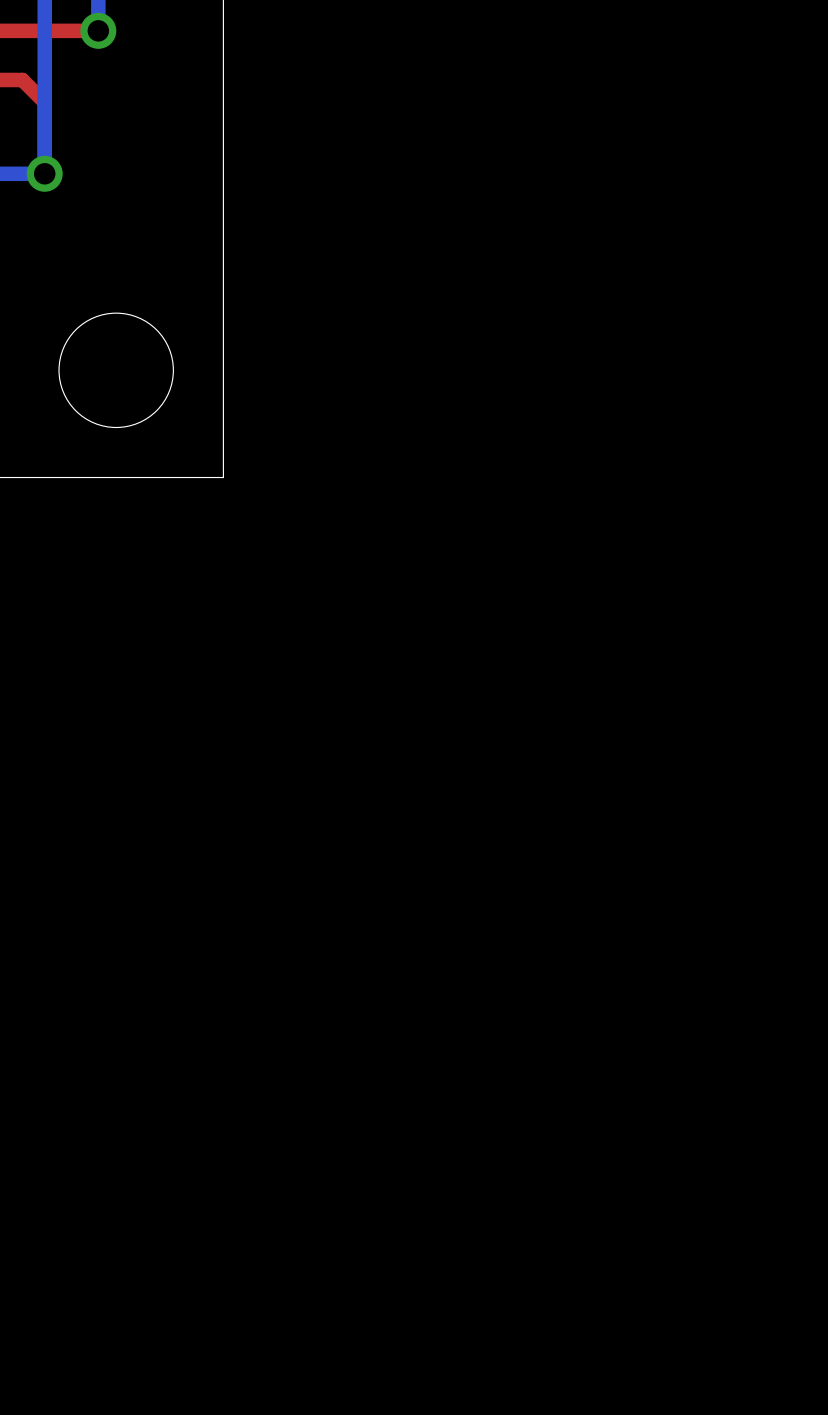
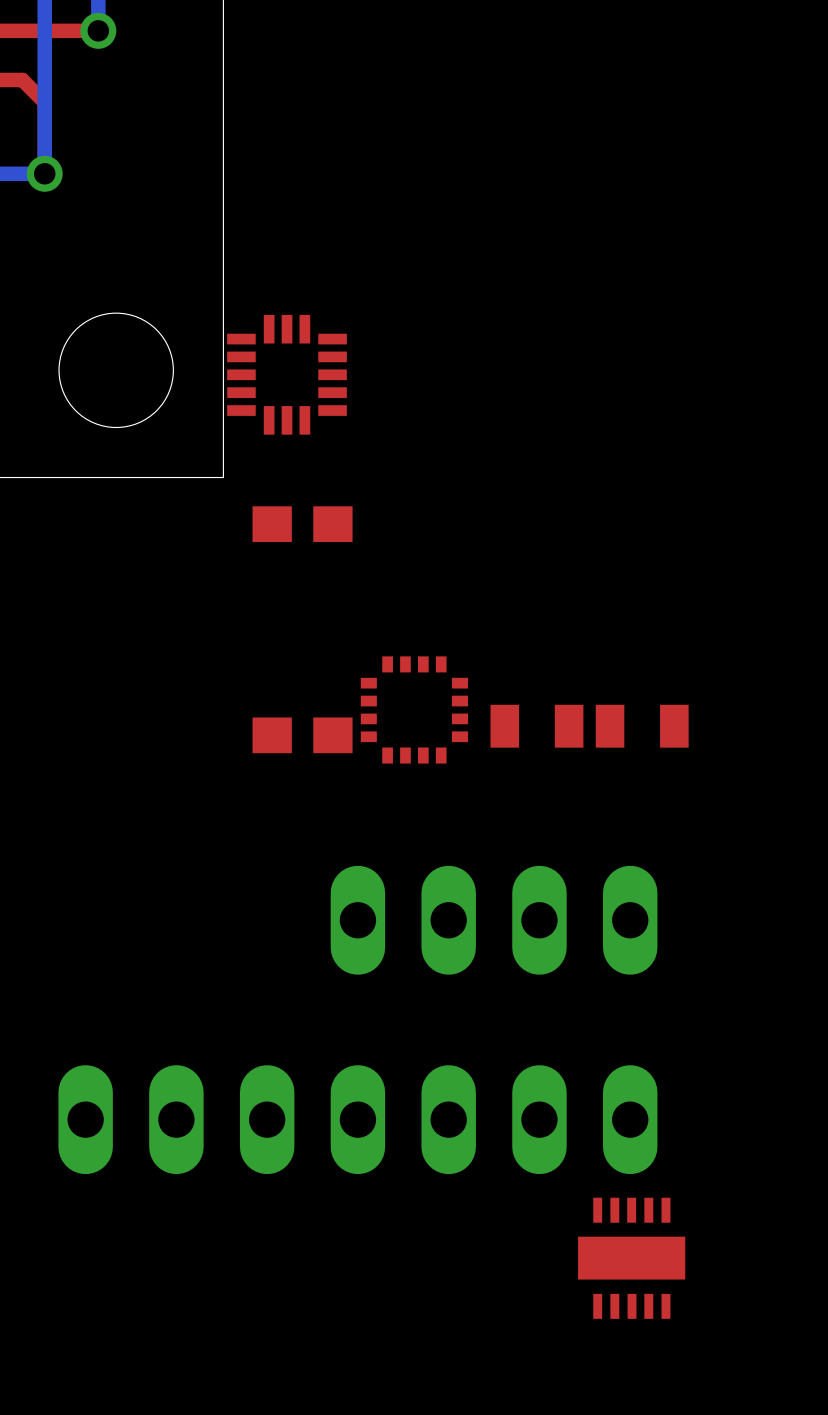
part: none -> (287, 374)
part: none -> (302, 524)
part: none -> (414, 709)
part: none -> (536, 726)
part: none -> (642, 726)
part: none -> (302, 735)
part: none -> (494, 920)
part: none -> (357, 1119)
part: none -> (631, 1258)

